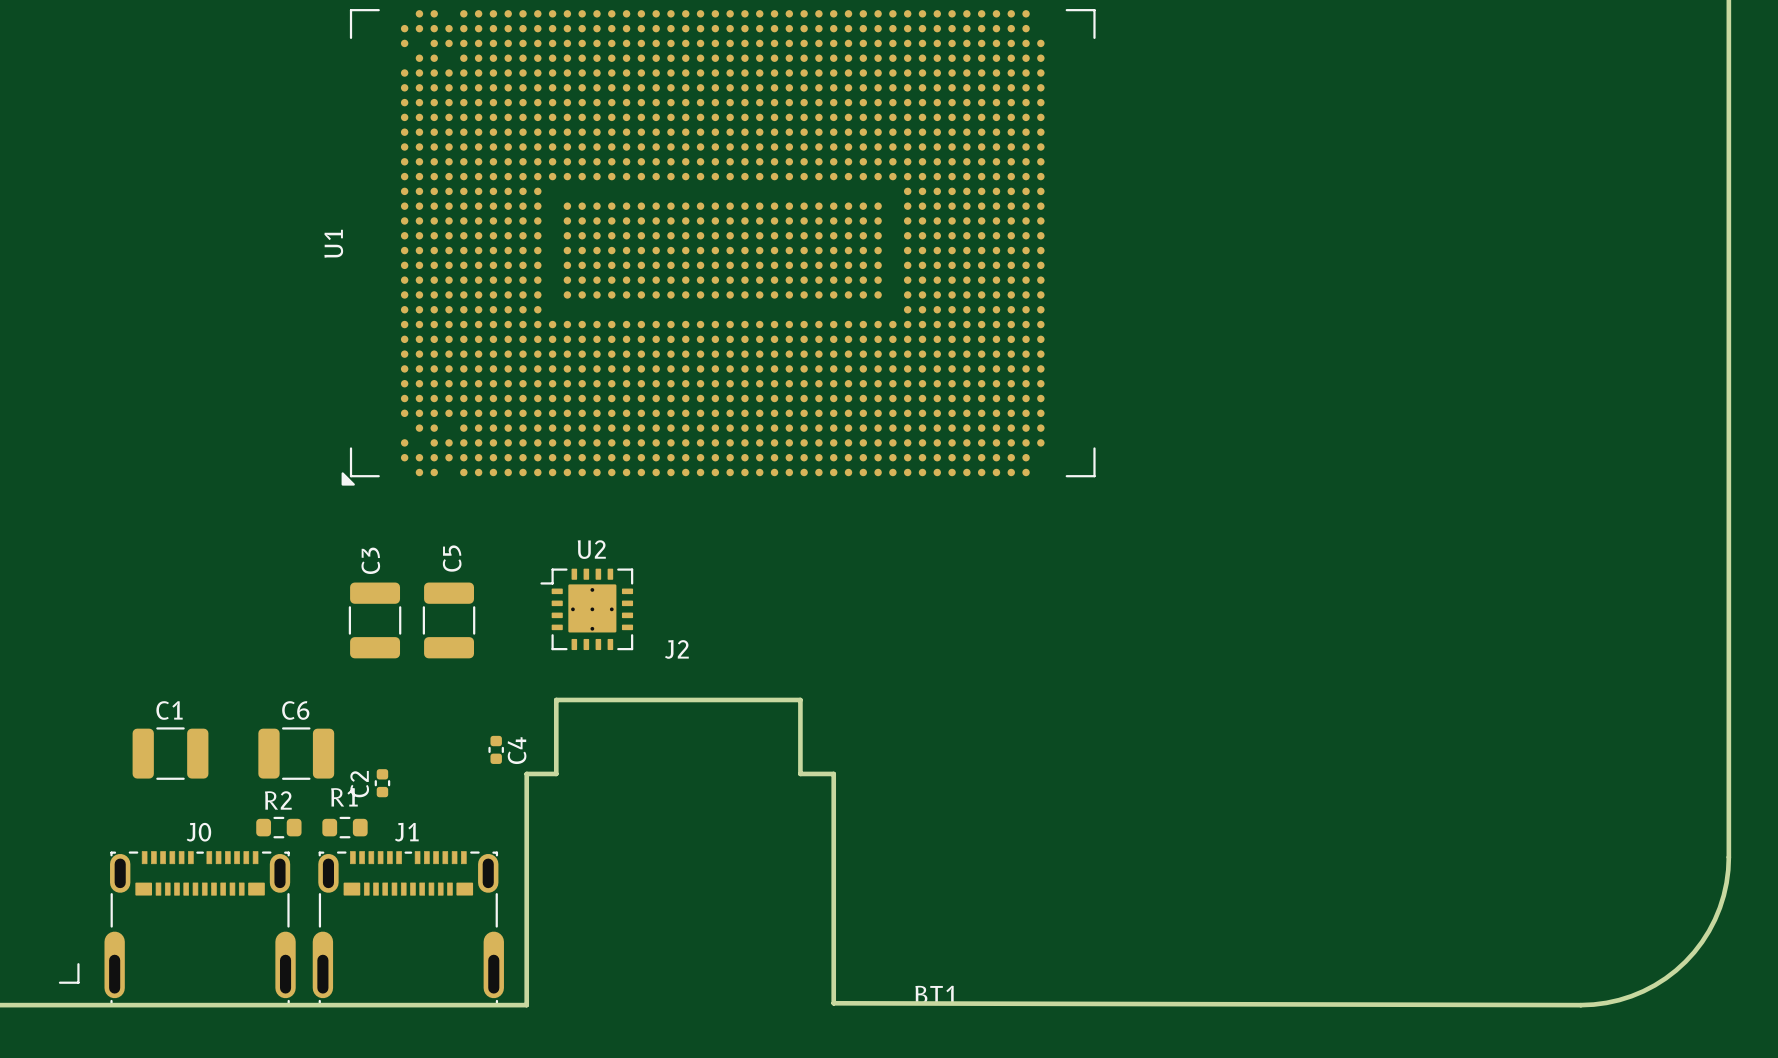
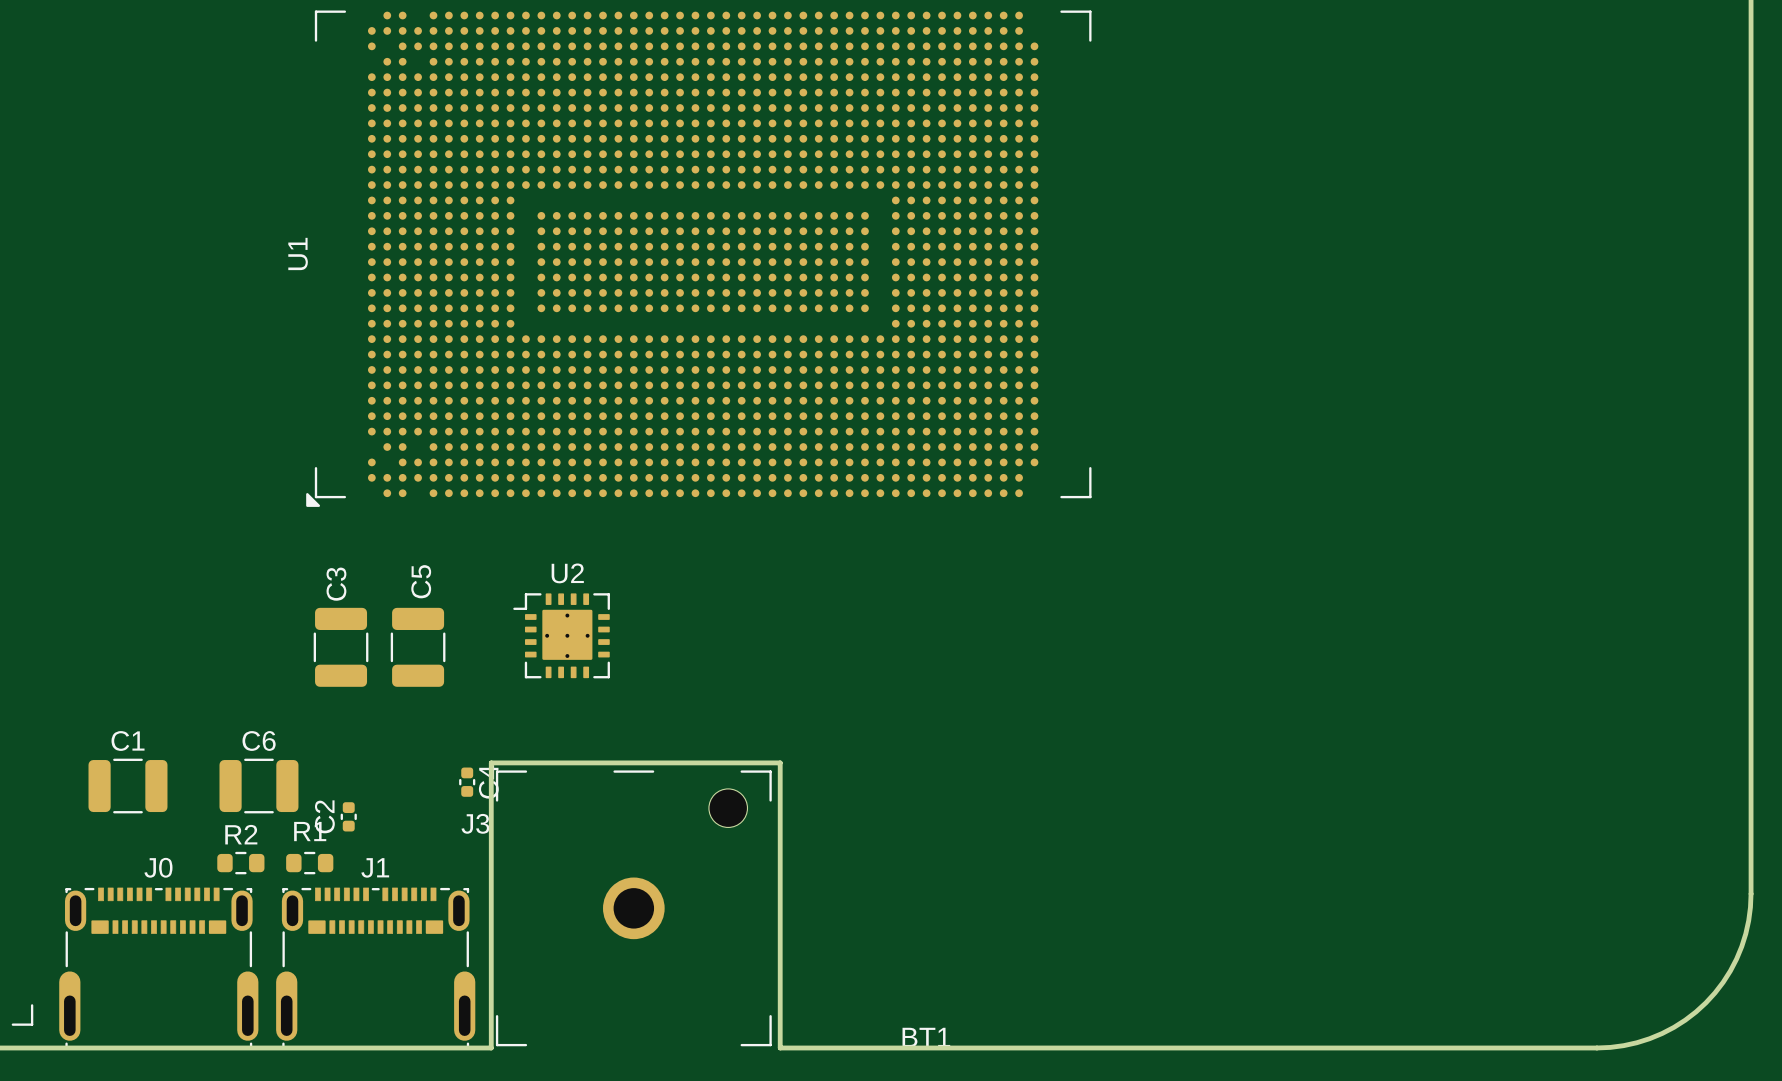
J2: (676, 649) -> none
J3: none -> (633, 908)
board edge: (519, 1005) (526, 1005) (526, 773) (556, 773) (556, 699) (800, 699) (800, 773) (833, 773) (833, 1003) (1580, 1005) -> (491, 1047) (491, 762) (780, 762) (780, 1047) (1596, 1047)

